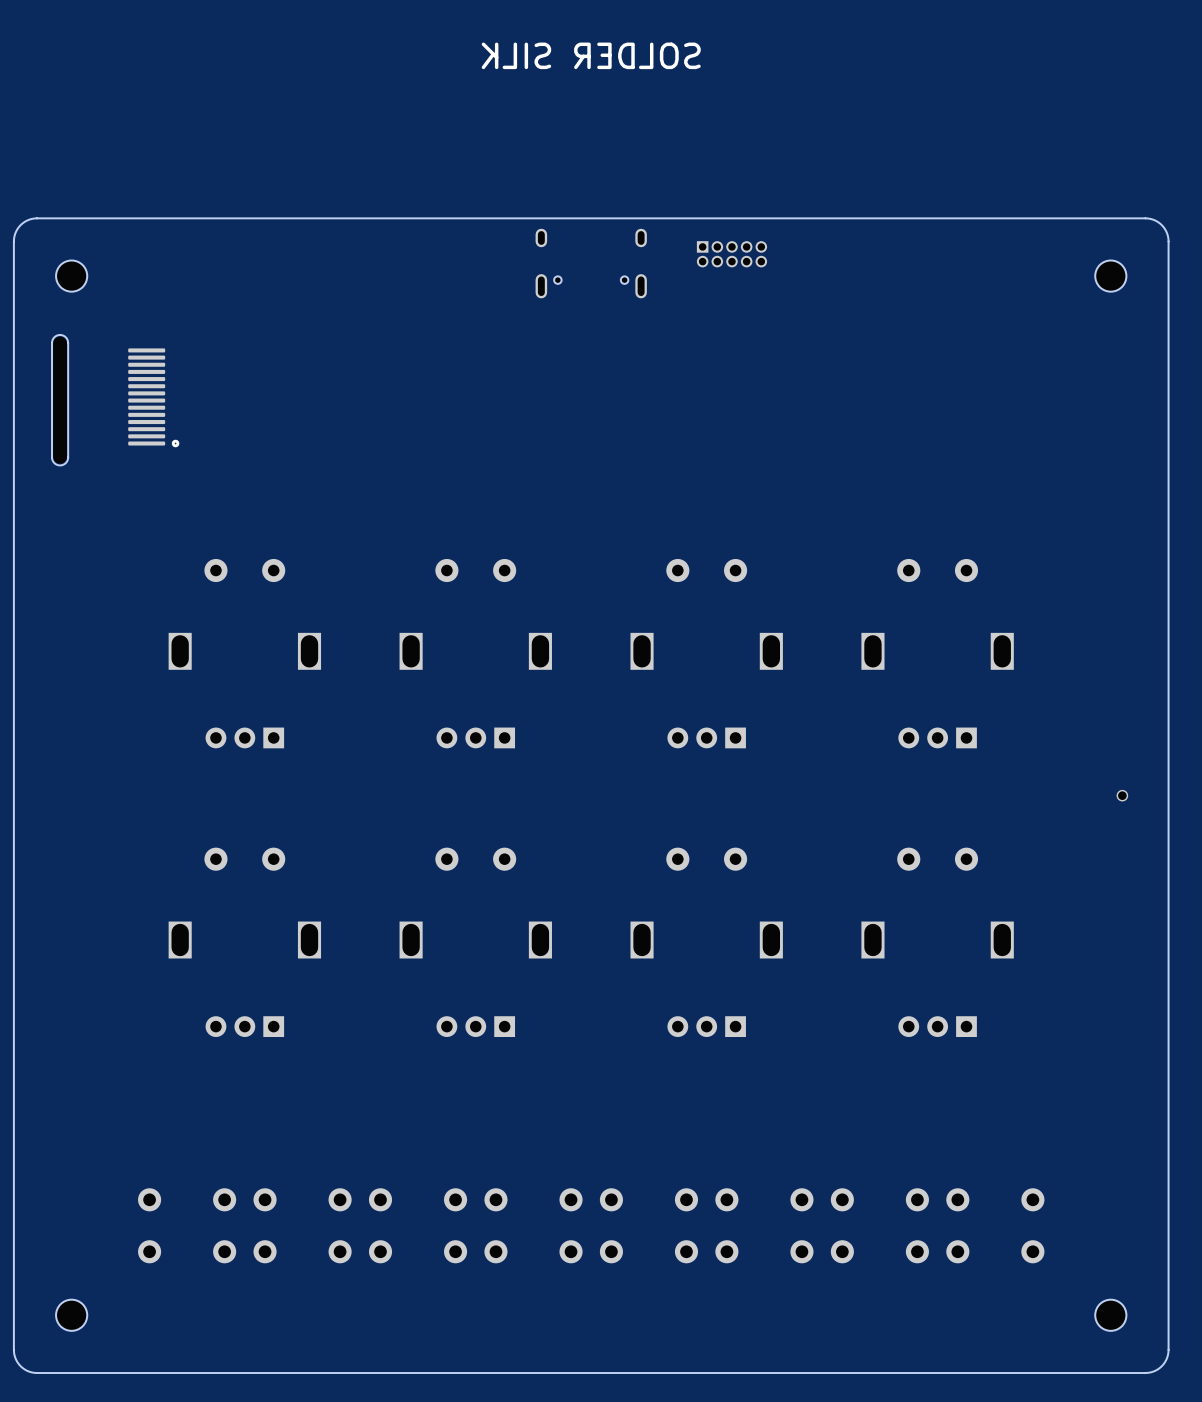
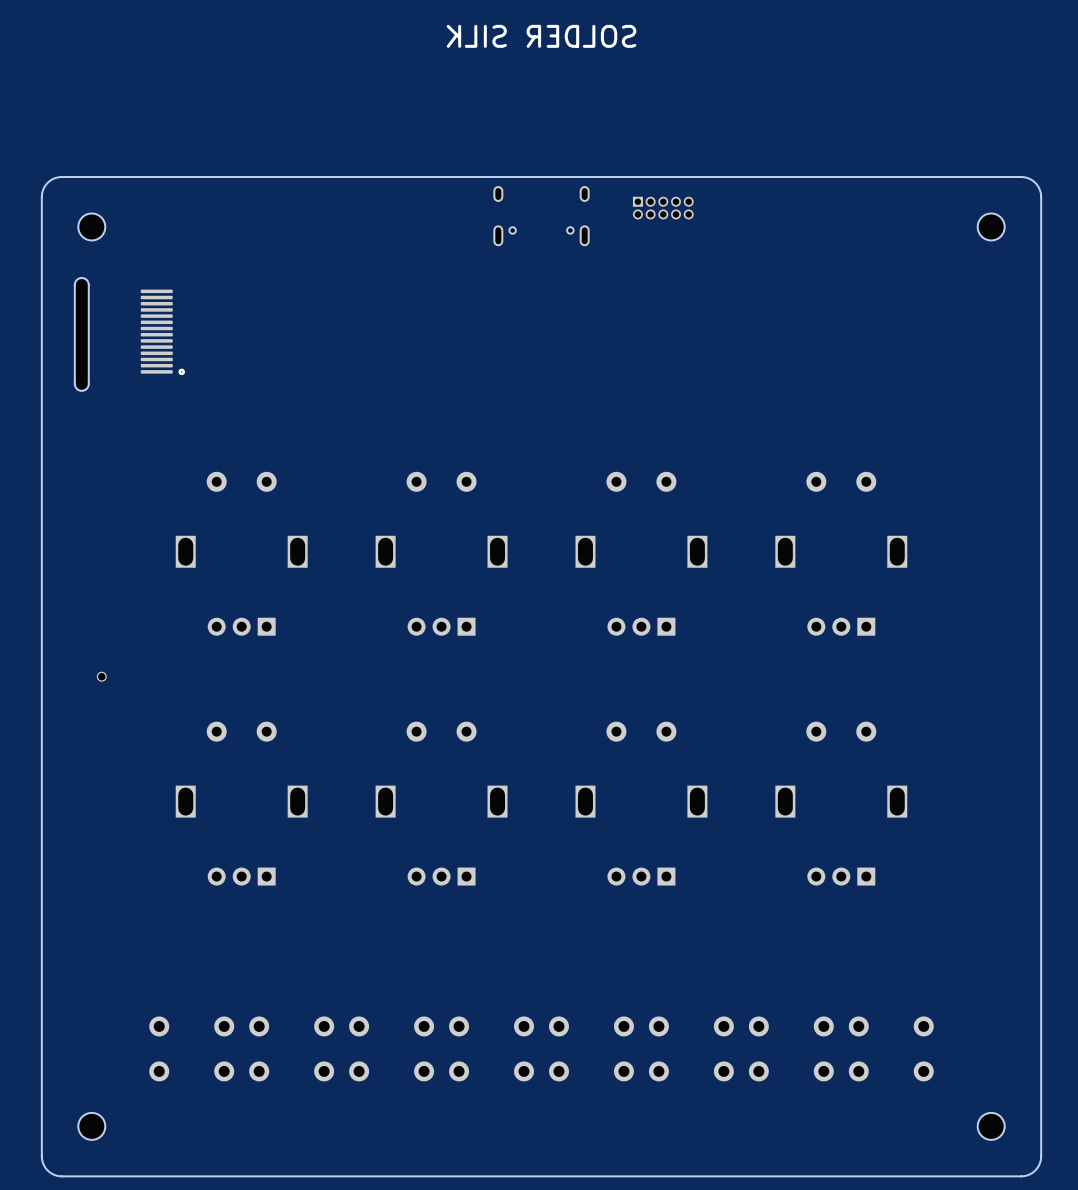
part: none -> (101, 676)
part: (1122, 795) -> none

